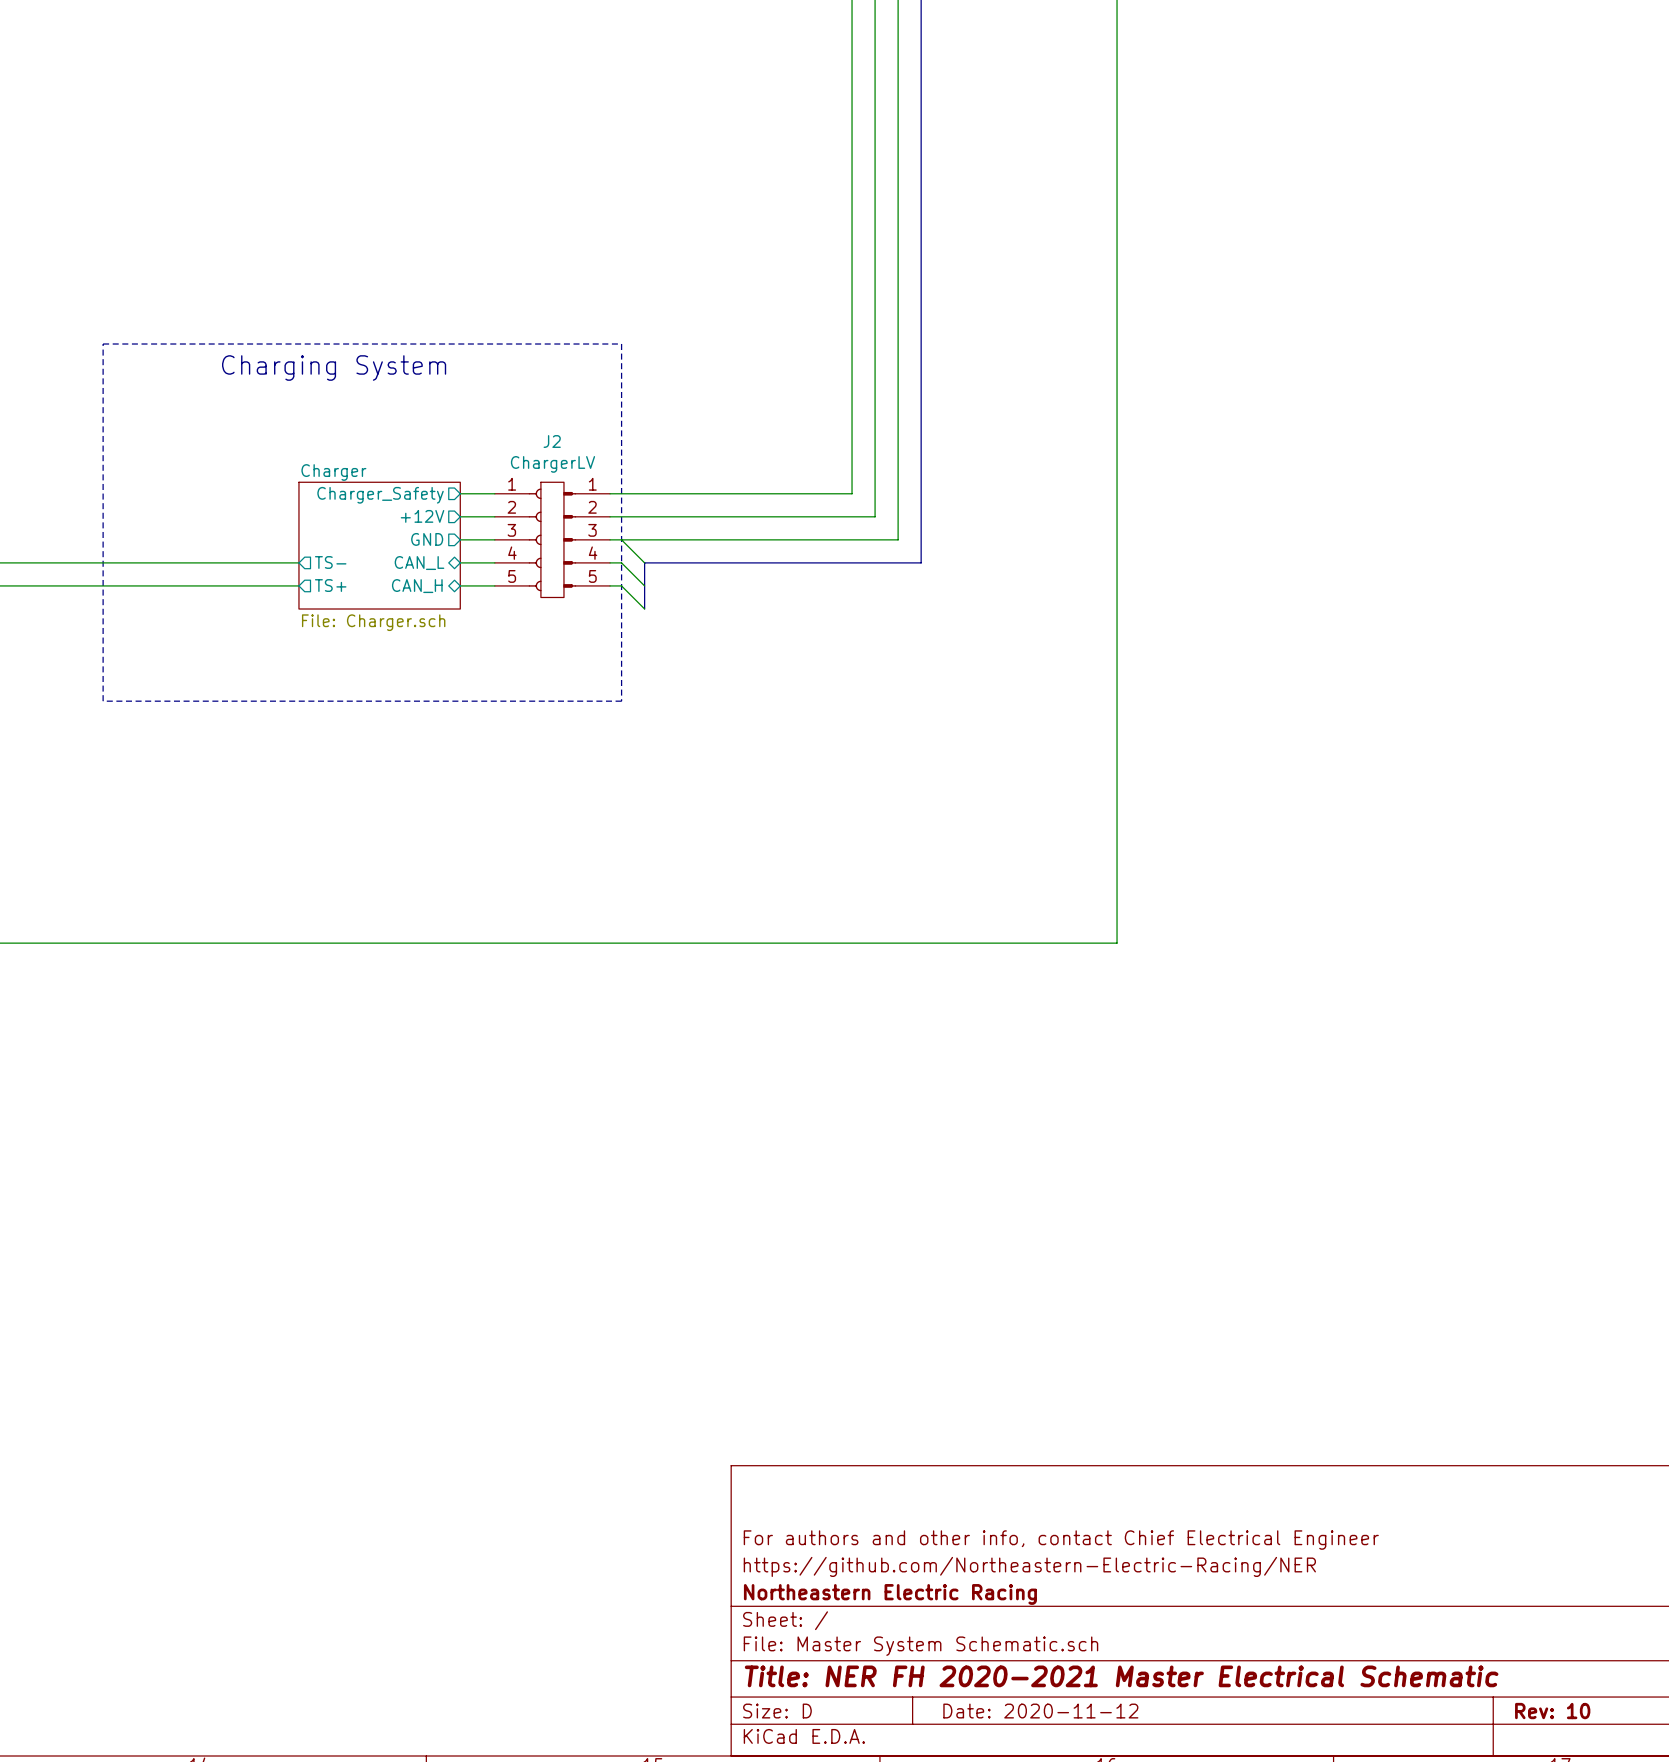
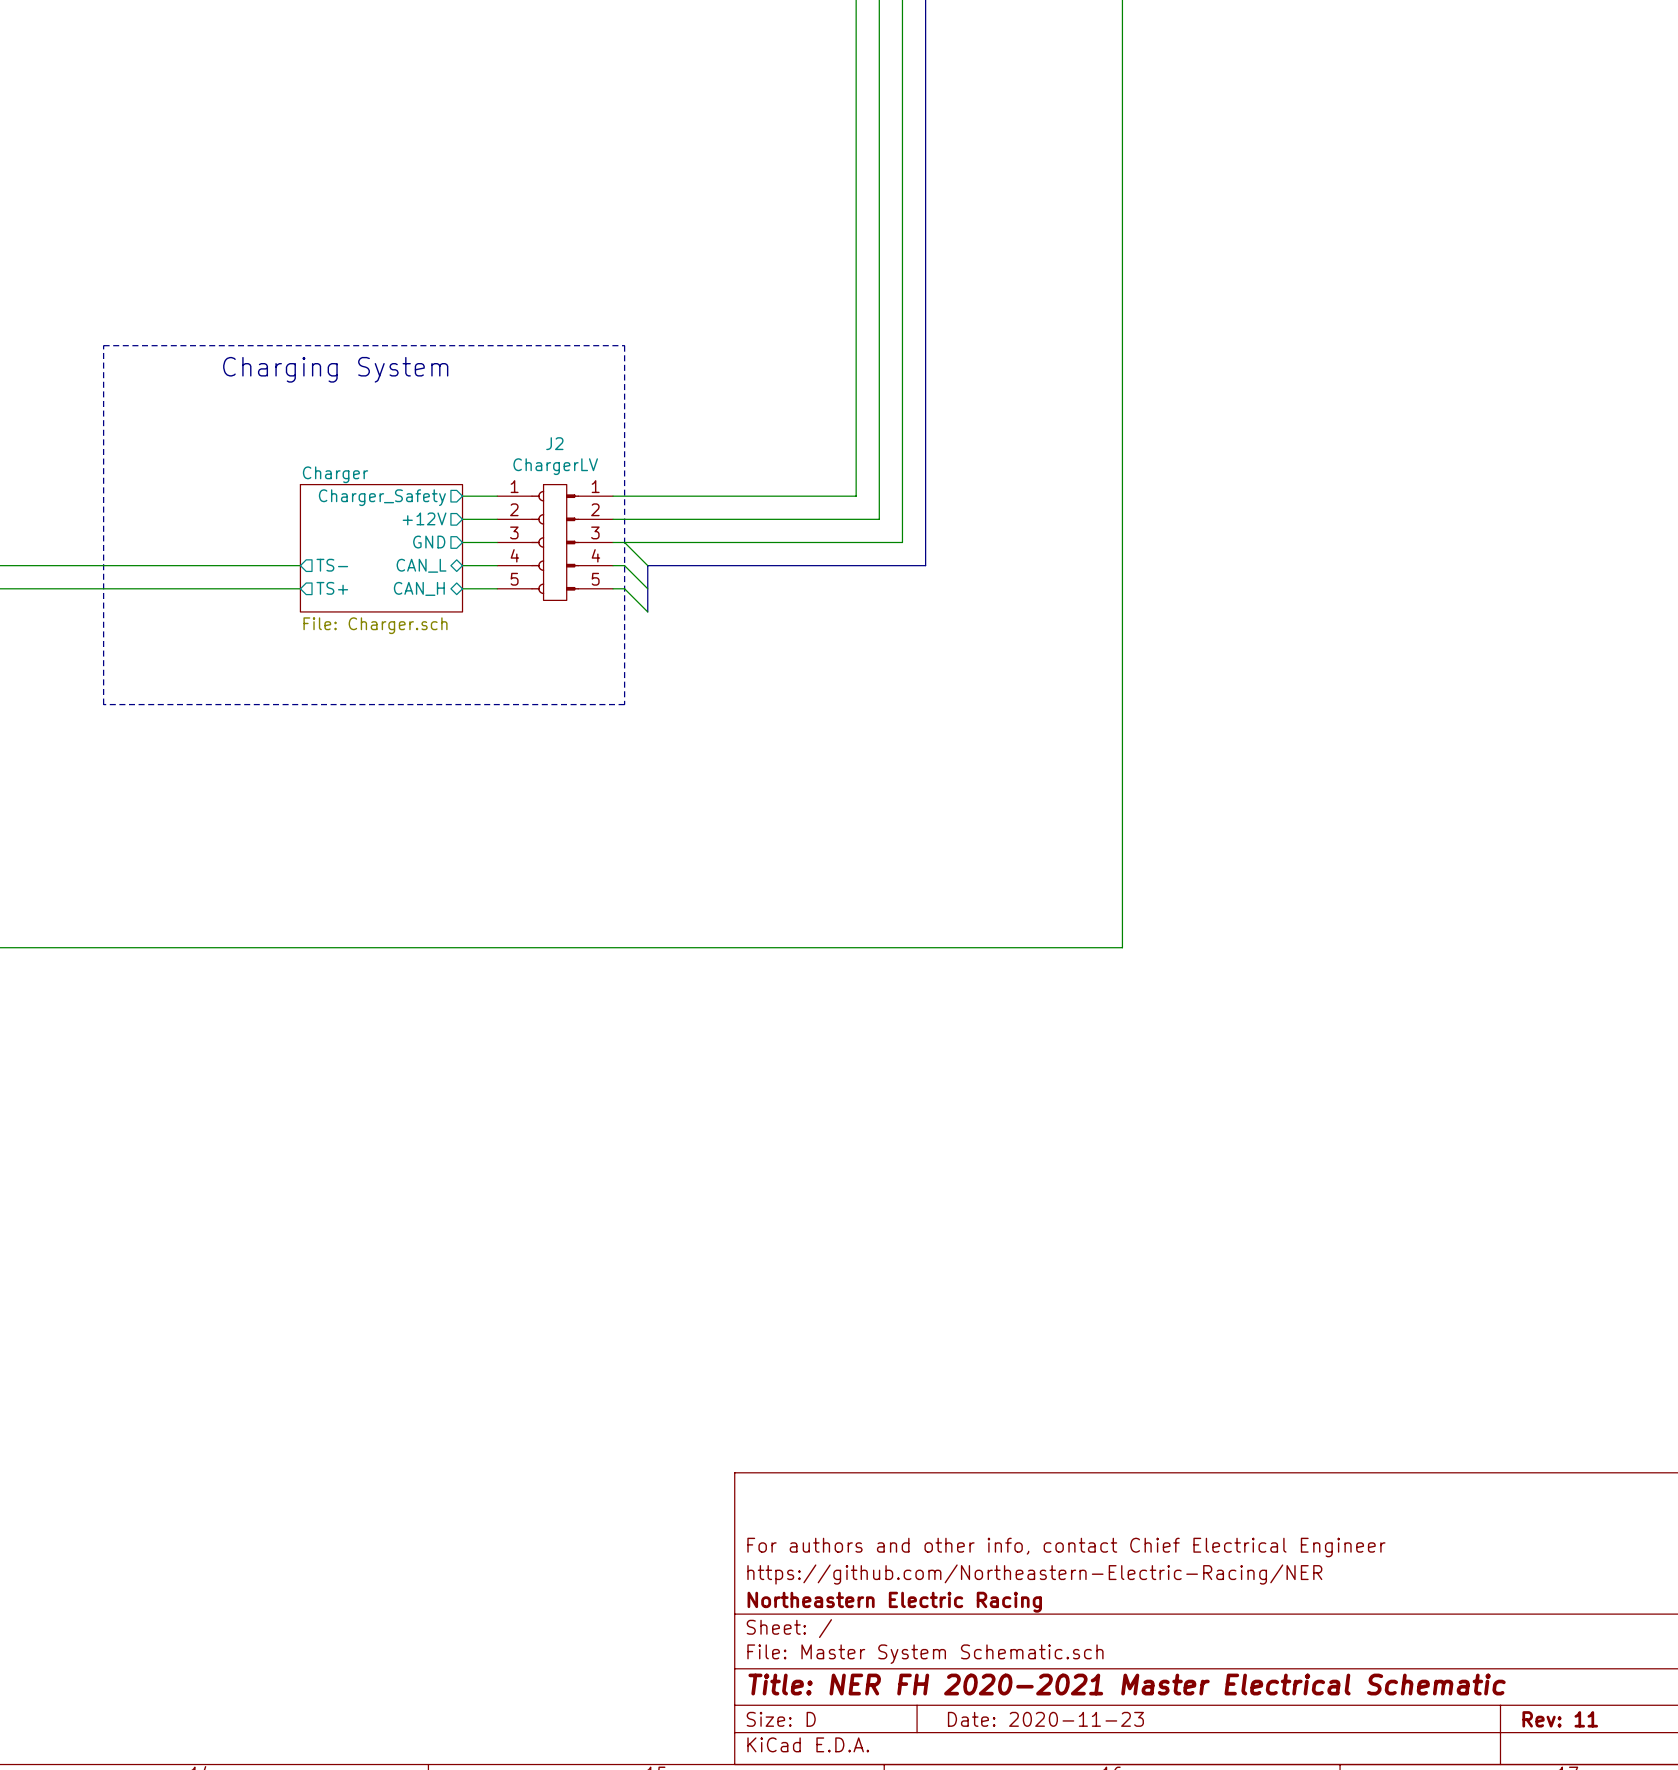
title block: Date: 2020-11-12 (1040, 1711) -> Date: 2020-11-23 (1045, 1719)
title block: Rev: 10 (1552, 1711) -> Rev: 11 (1560, 1719)

